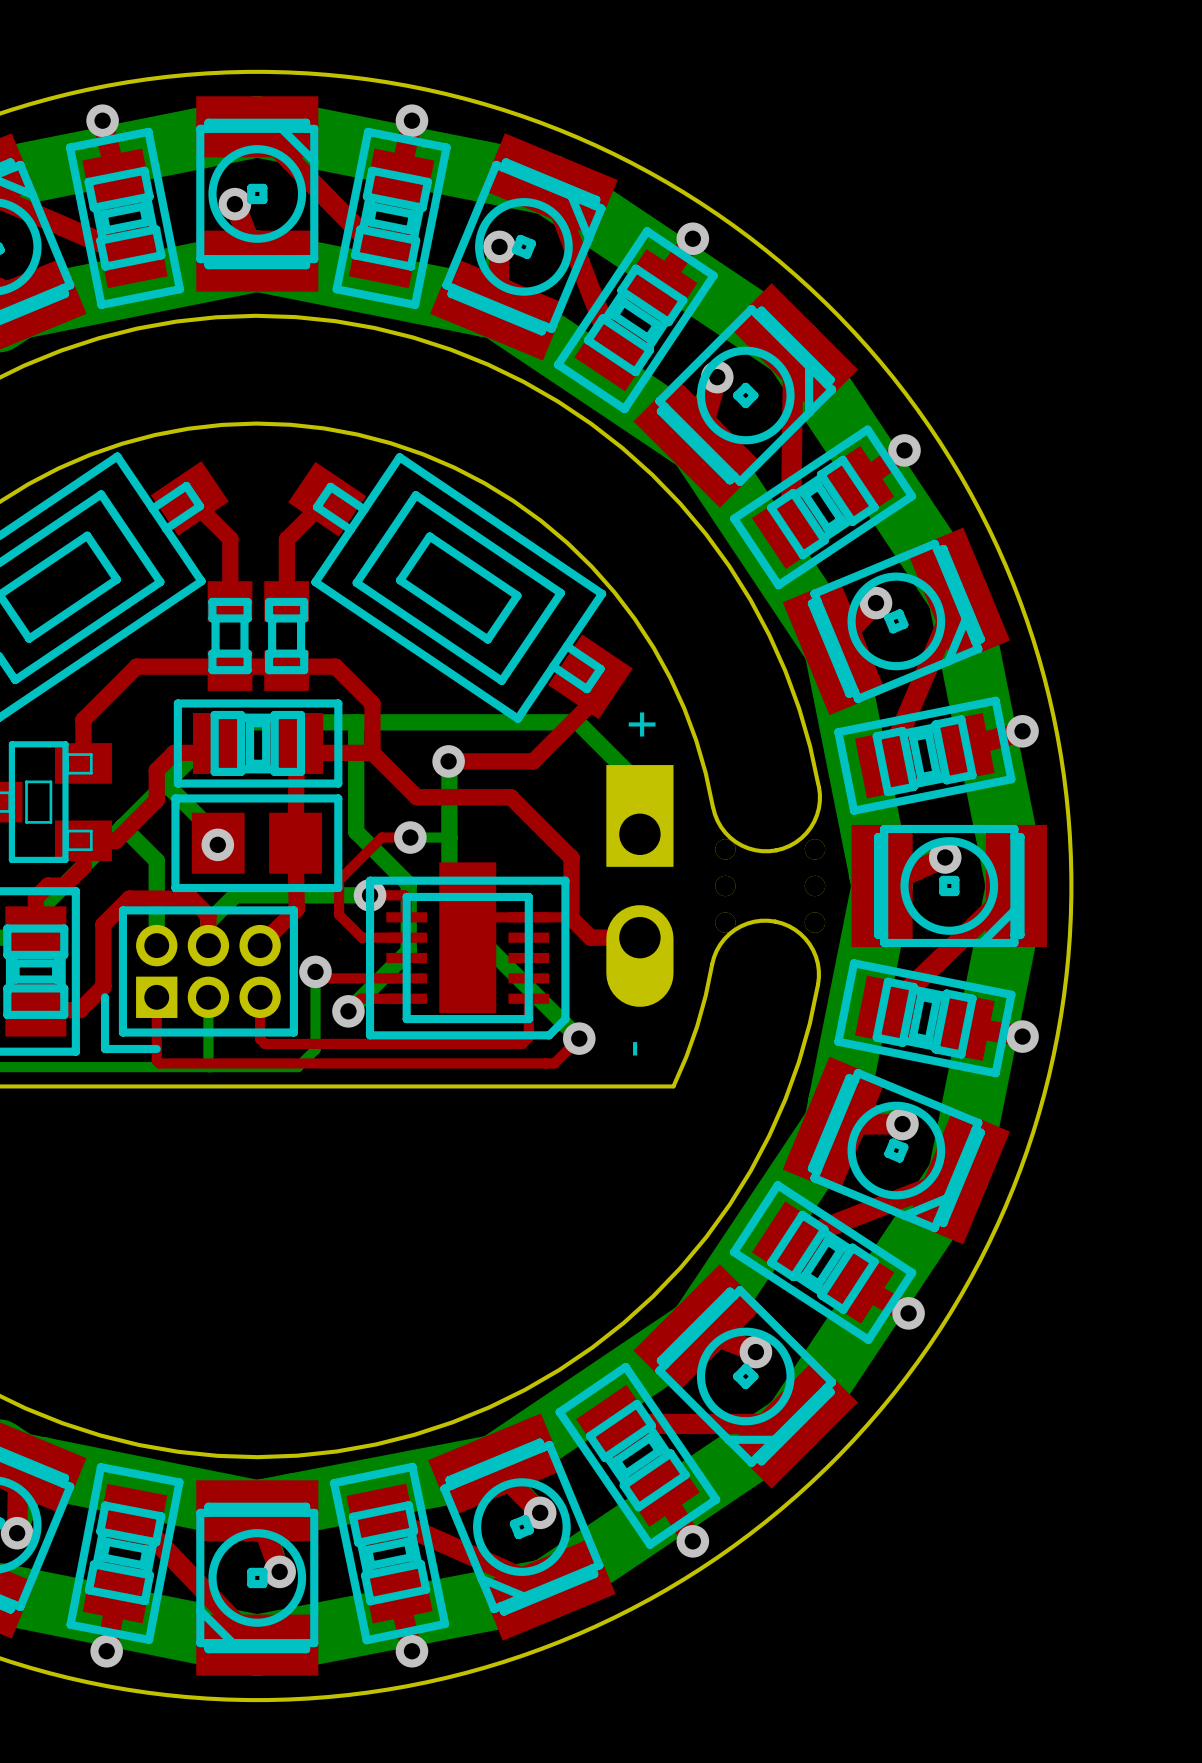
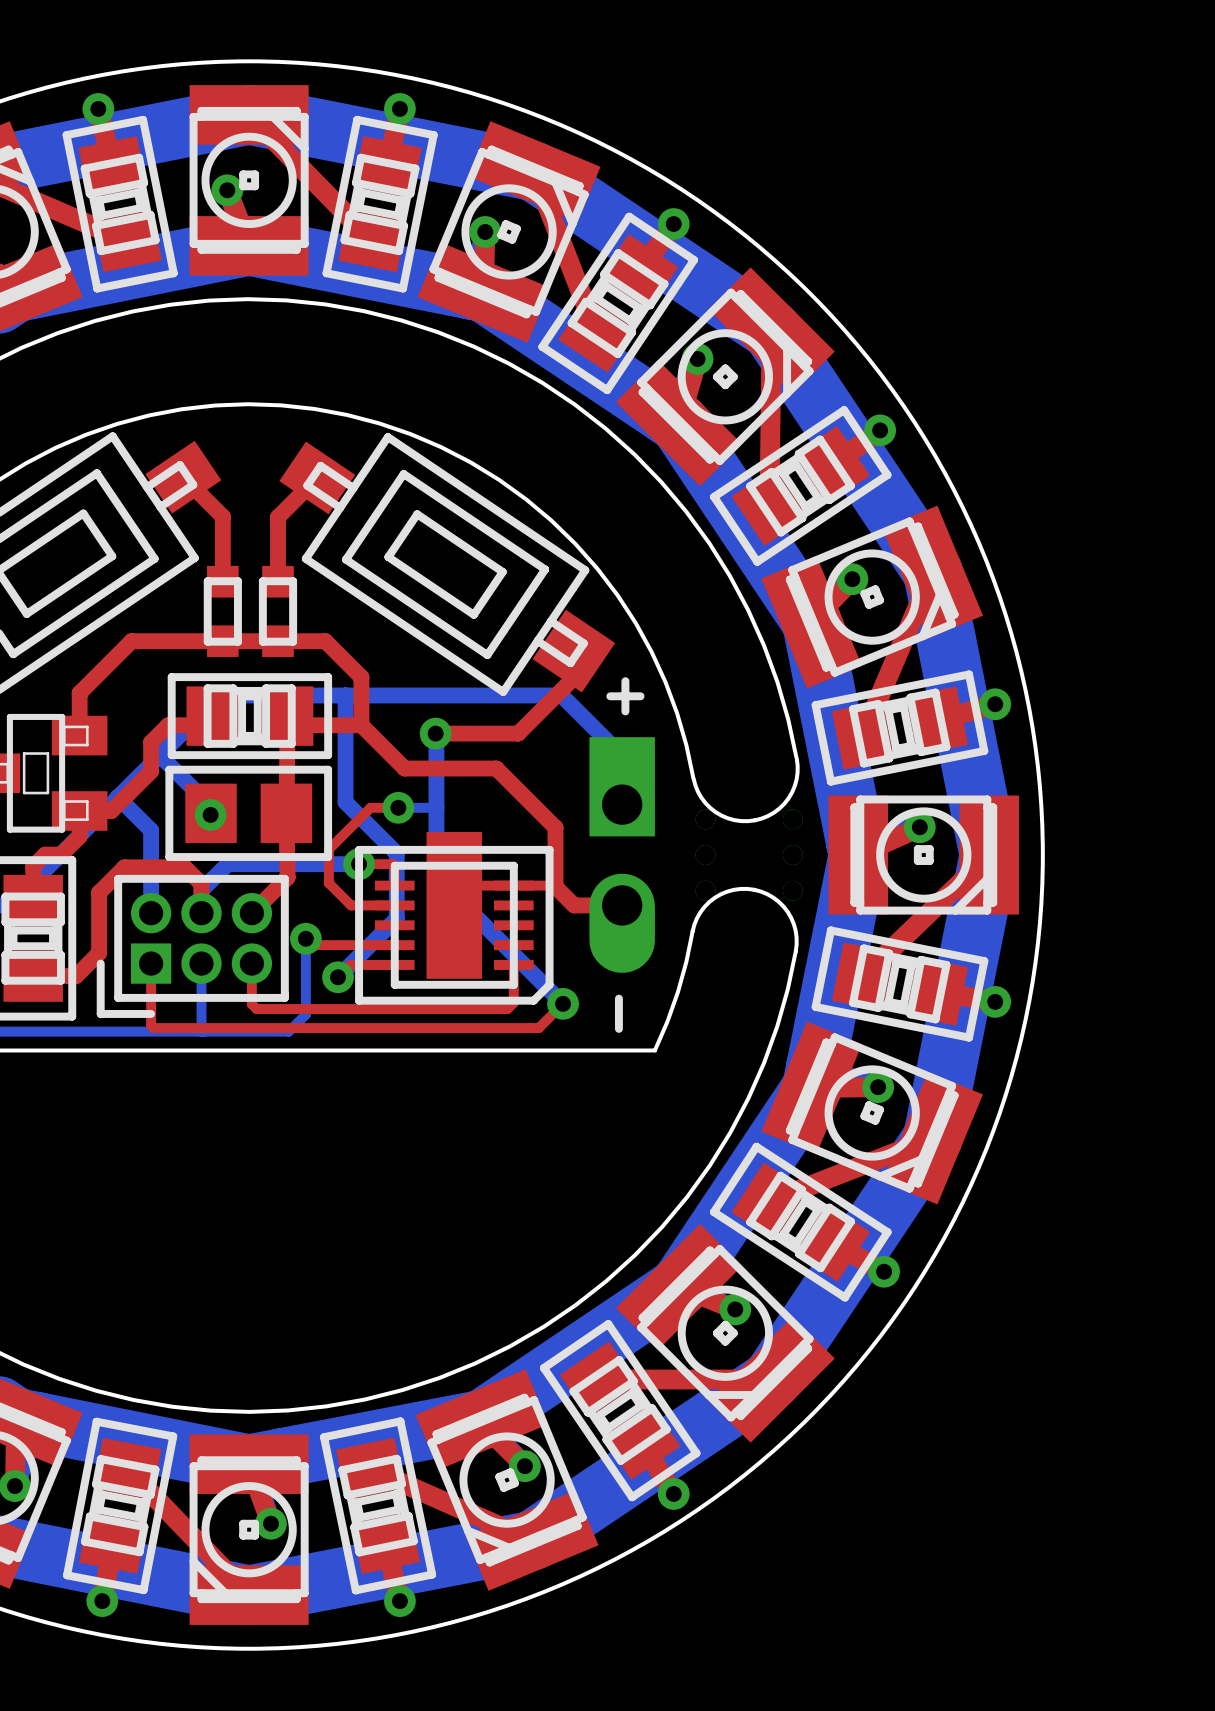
part footprint: [207, 581, 253, 691] -> [203, 565, 242, 658]
part footprint: [264, 581, 309, 691] -> [258, 565, 298, 658]

